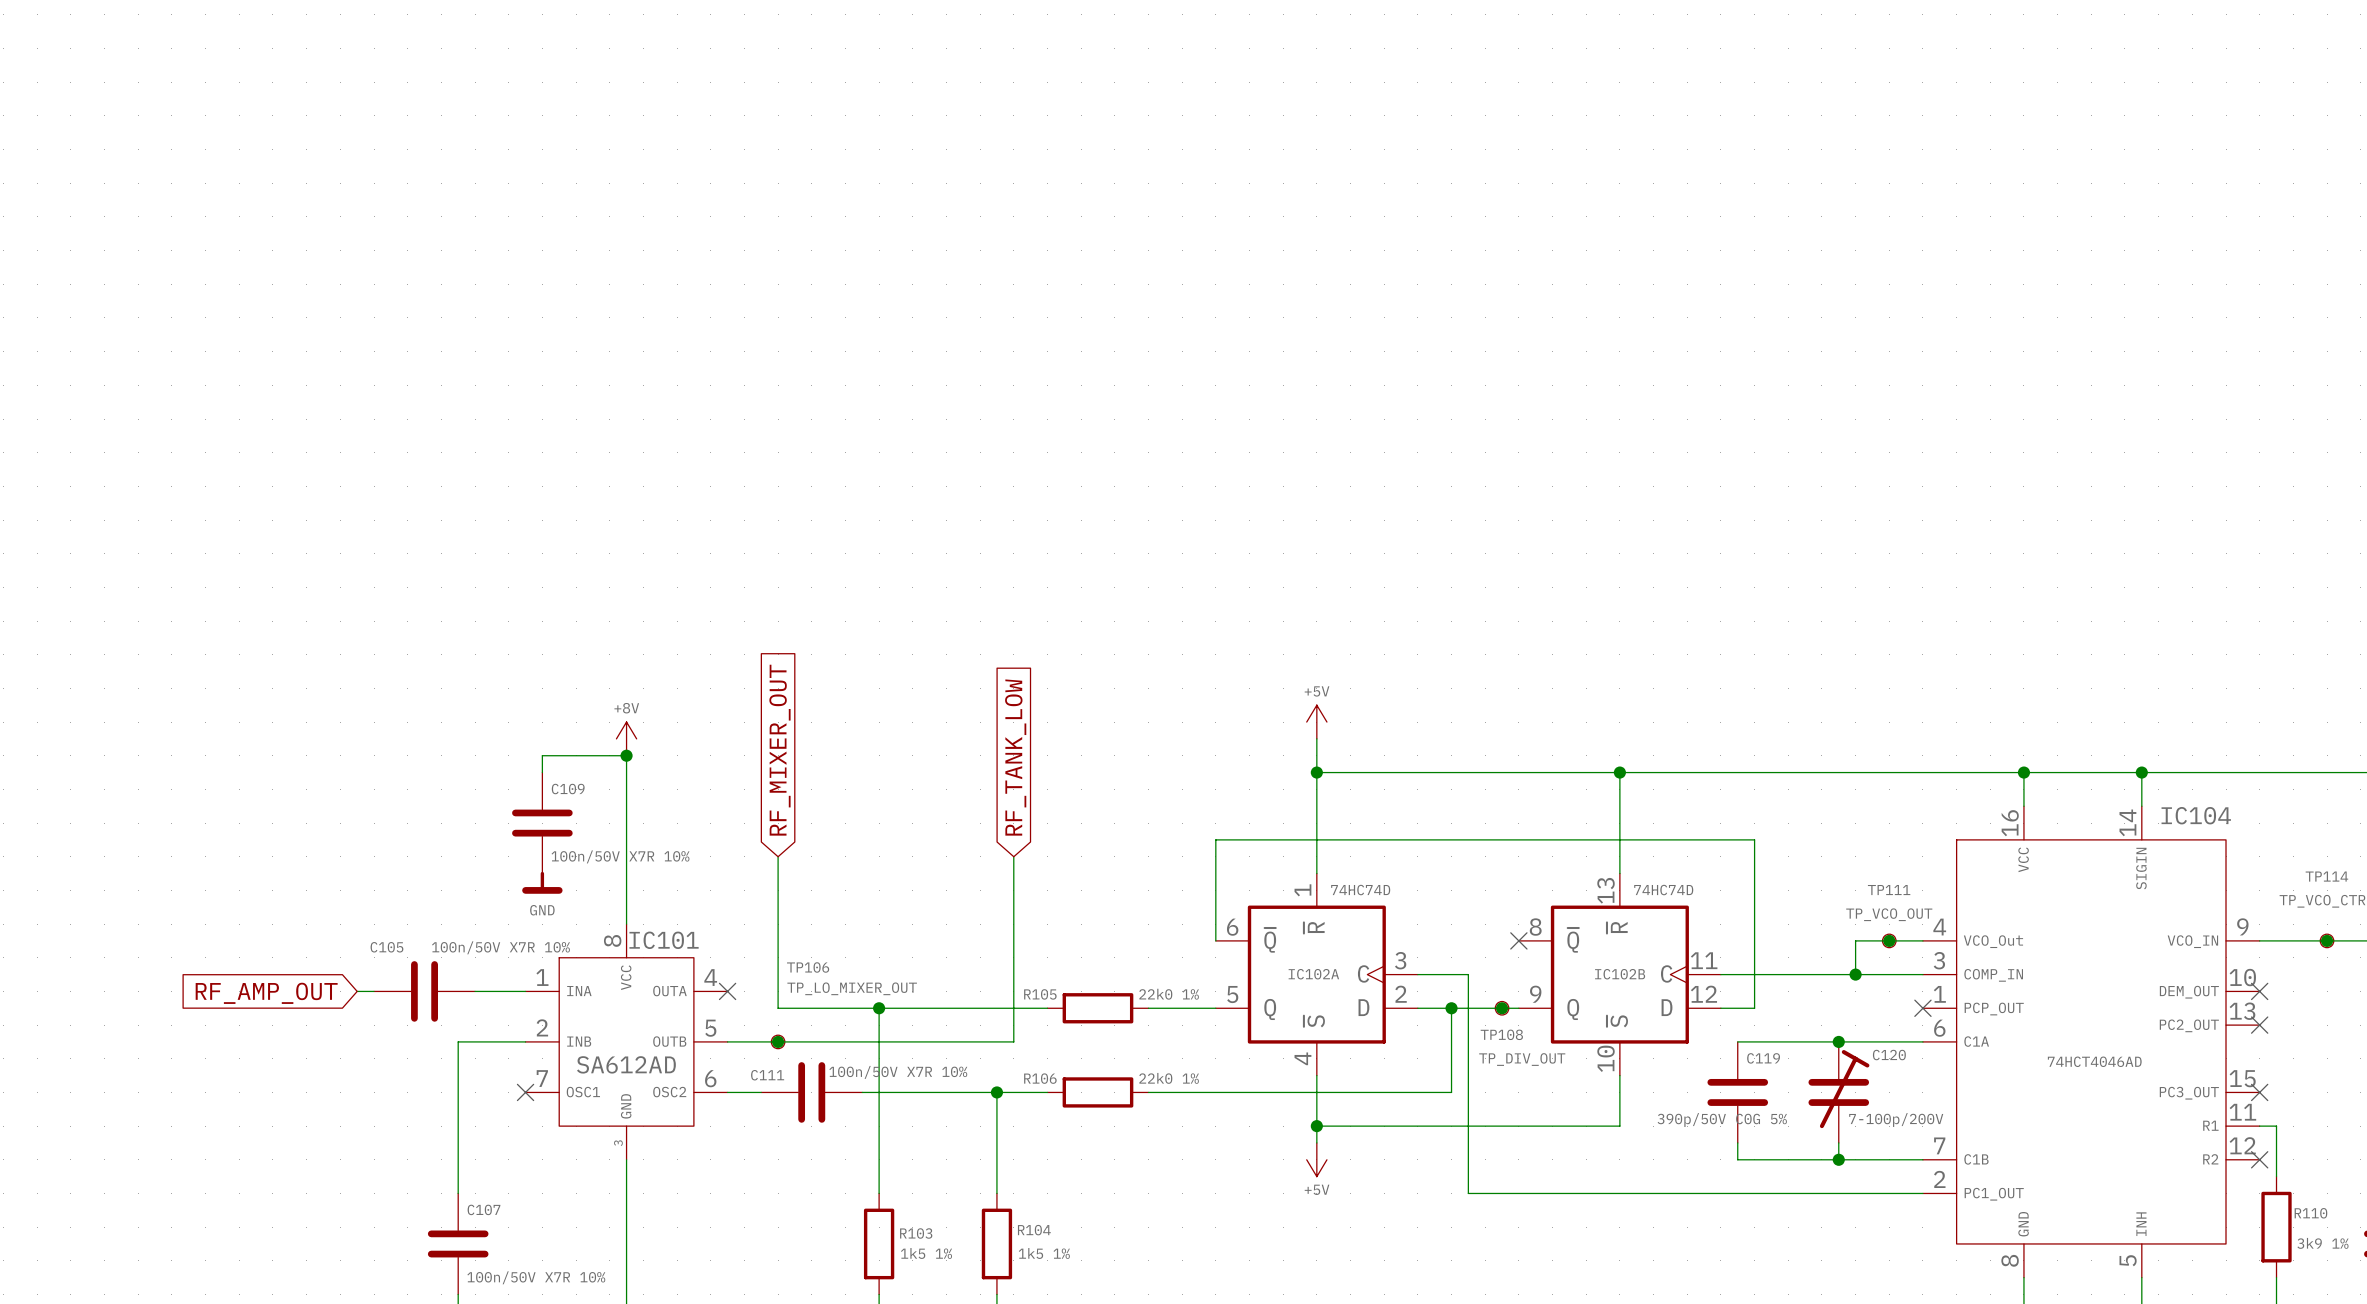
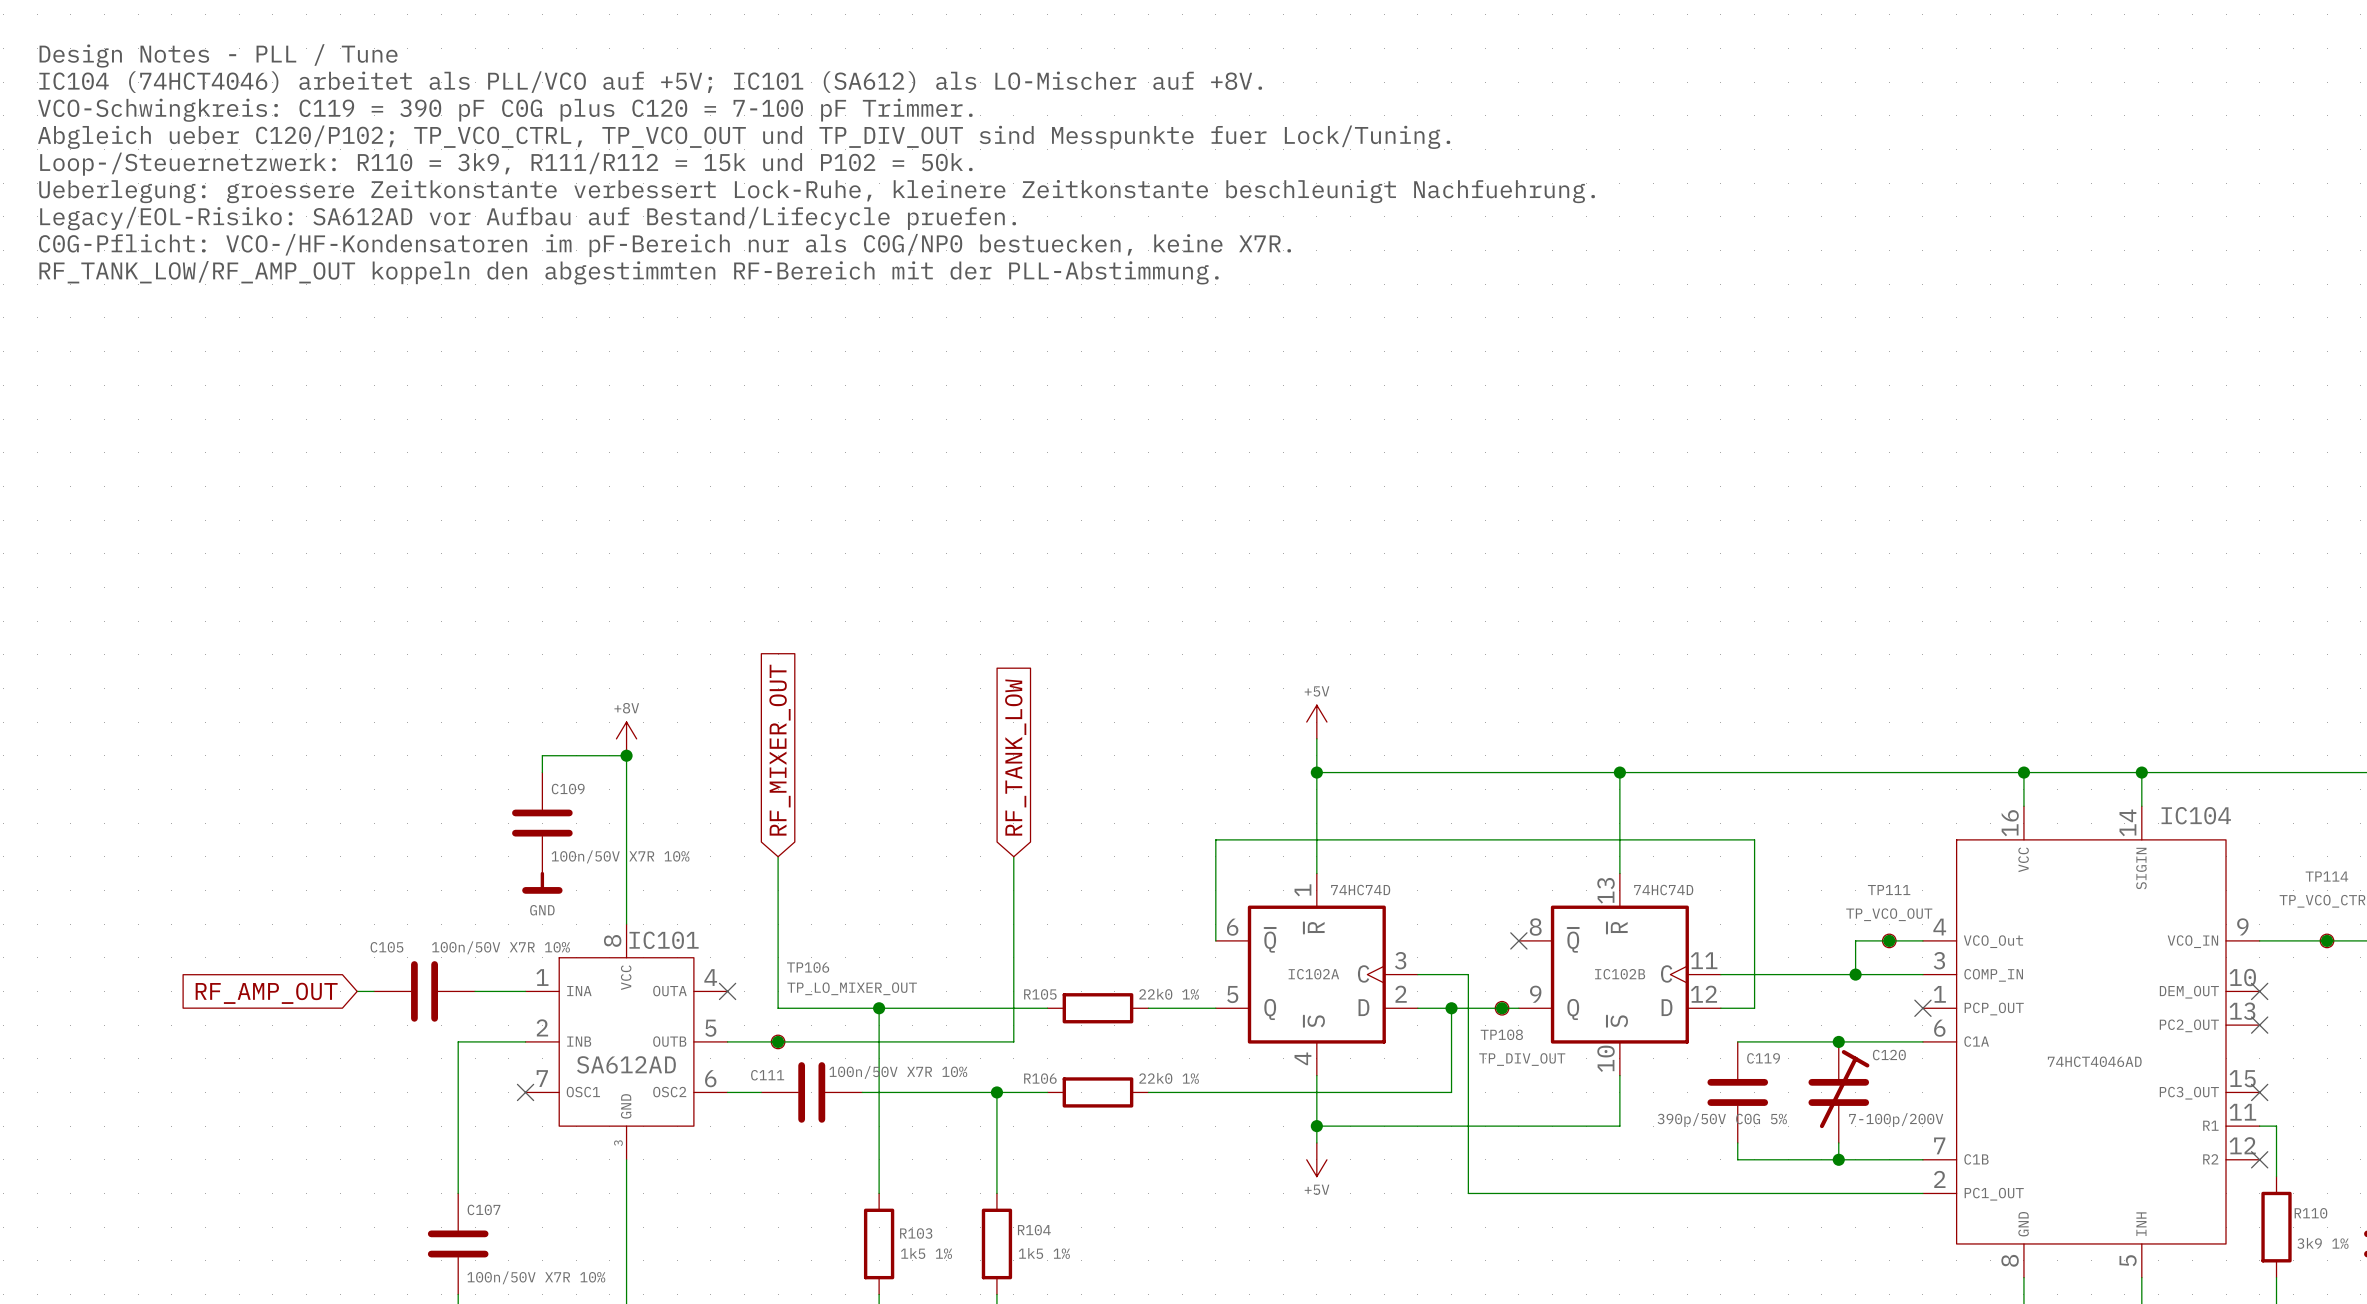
text: none -> Design Notes - PLL / Tune (218, 55)
text: none -> IC104 (74HCT4046) arbeitet als PLL/VCO auf +5V; IC101 (SA612) als LO-Mischer auf +8V. (650, 82)
text: none -> VCO-Schwingkreis: C119 = 390 pF C0G plus C120 = 7-100 pF Trimmer. (505, 110)
text: none -> Abgleich ueber C120/P102; TP_VCO_CTRL, TP_VCO_OUT und TP_DIV_OUT sind Messpunkte fuer Lock/Tuning. (744, 137)
text: none -> Loop-/Steuernetzwerk: R110 = 3k9, R111/R112 = 15k und P102 = 50k. (506, 164)
text: none -> Ueberlegung: groessere Zeitkonstante verbessert Lock-Ruhe, kleinere Zeitkonstante beschleunigt Nachfuehrung. (817, 191)
text: none -> Legacy/EOL-Risiko: SA612AD vor Aufbau auf Bestand/Lifecycle pruefen. (528, 218)
text: none -> C0G-Pflicht: VCO-/HF-Kondensatoren im pF-Bereich nur als C0G/NP0 bestuecken, keine X7R. (664, 245)
text: none -> RF_TANK_LOW/RF_AMP_OUT koppeln den abgestimmten RF-Bereich mit der PLL-Abstimmung. (629, 272)

